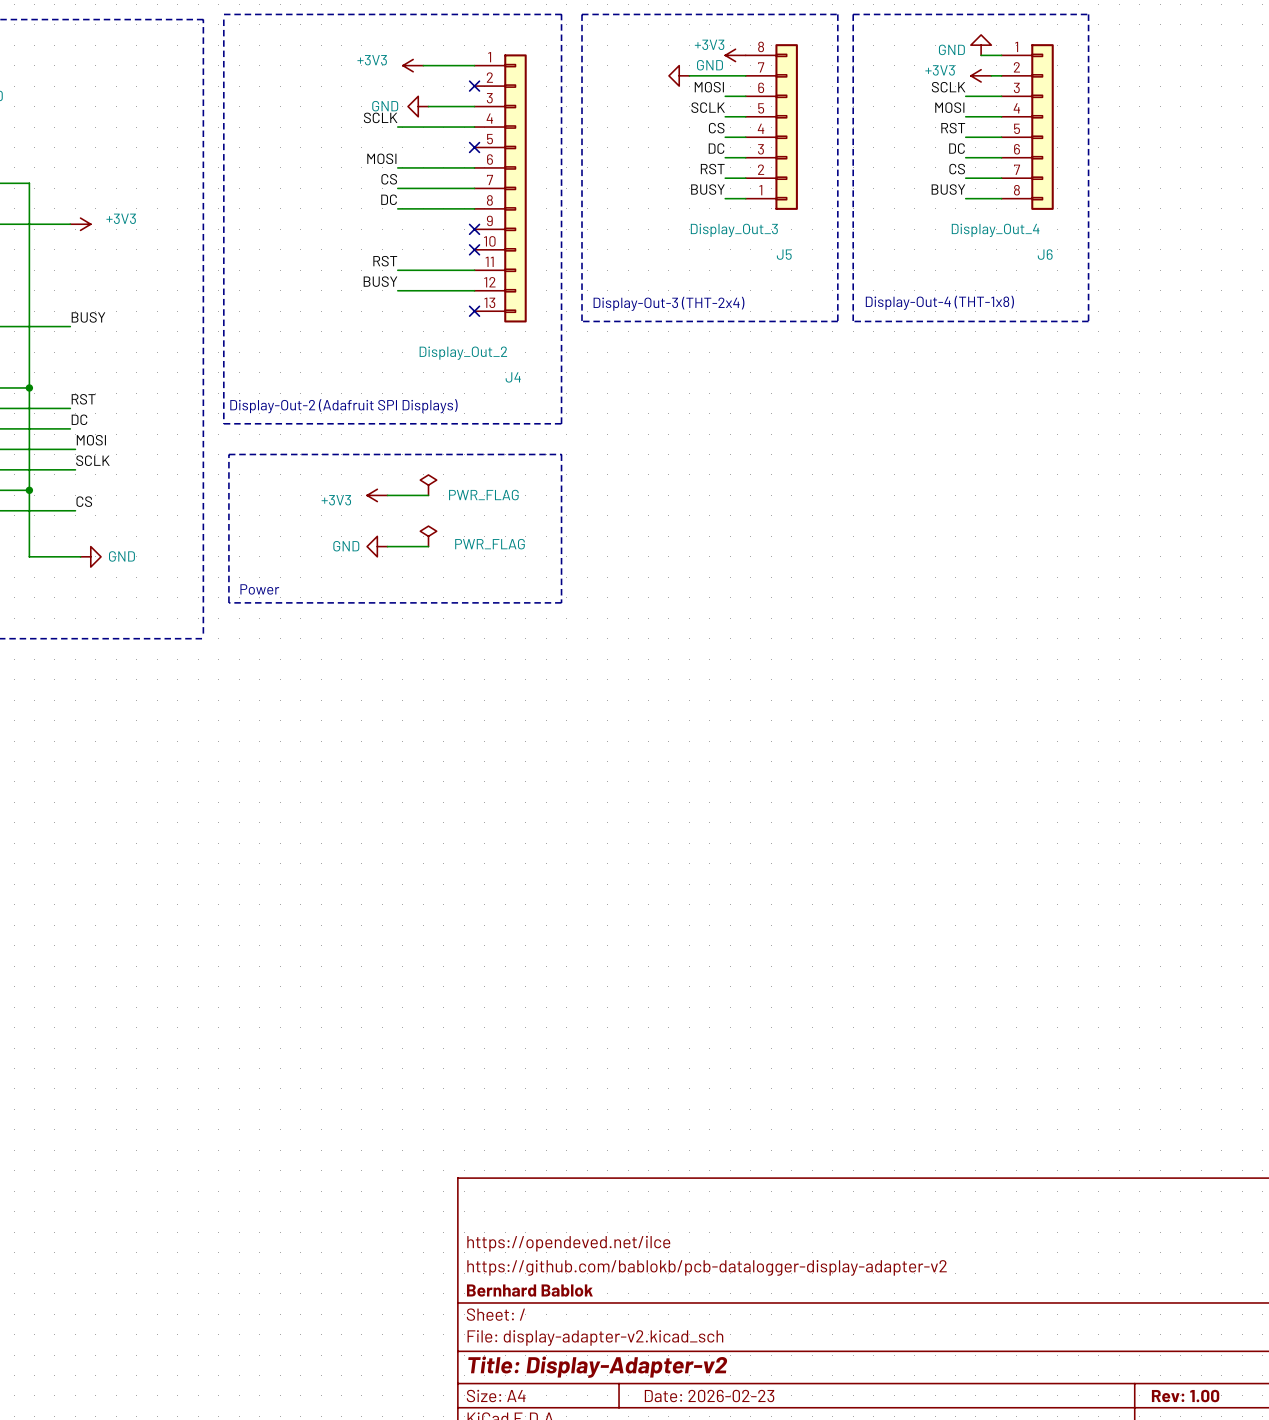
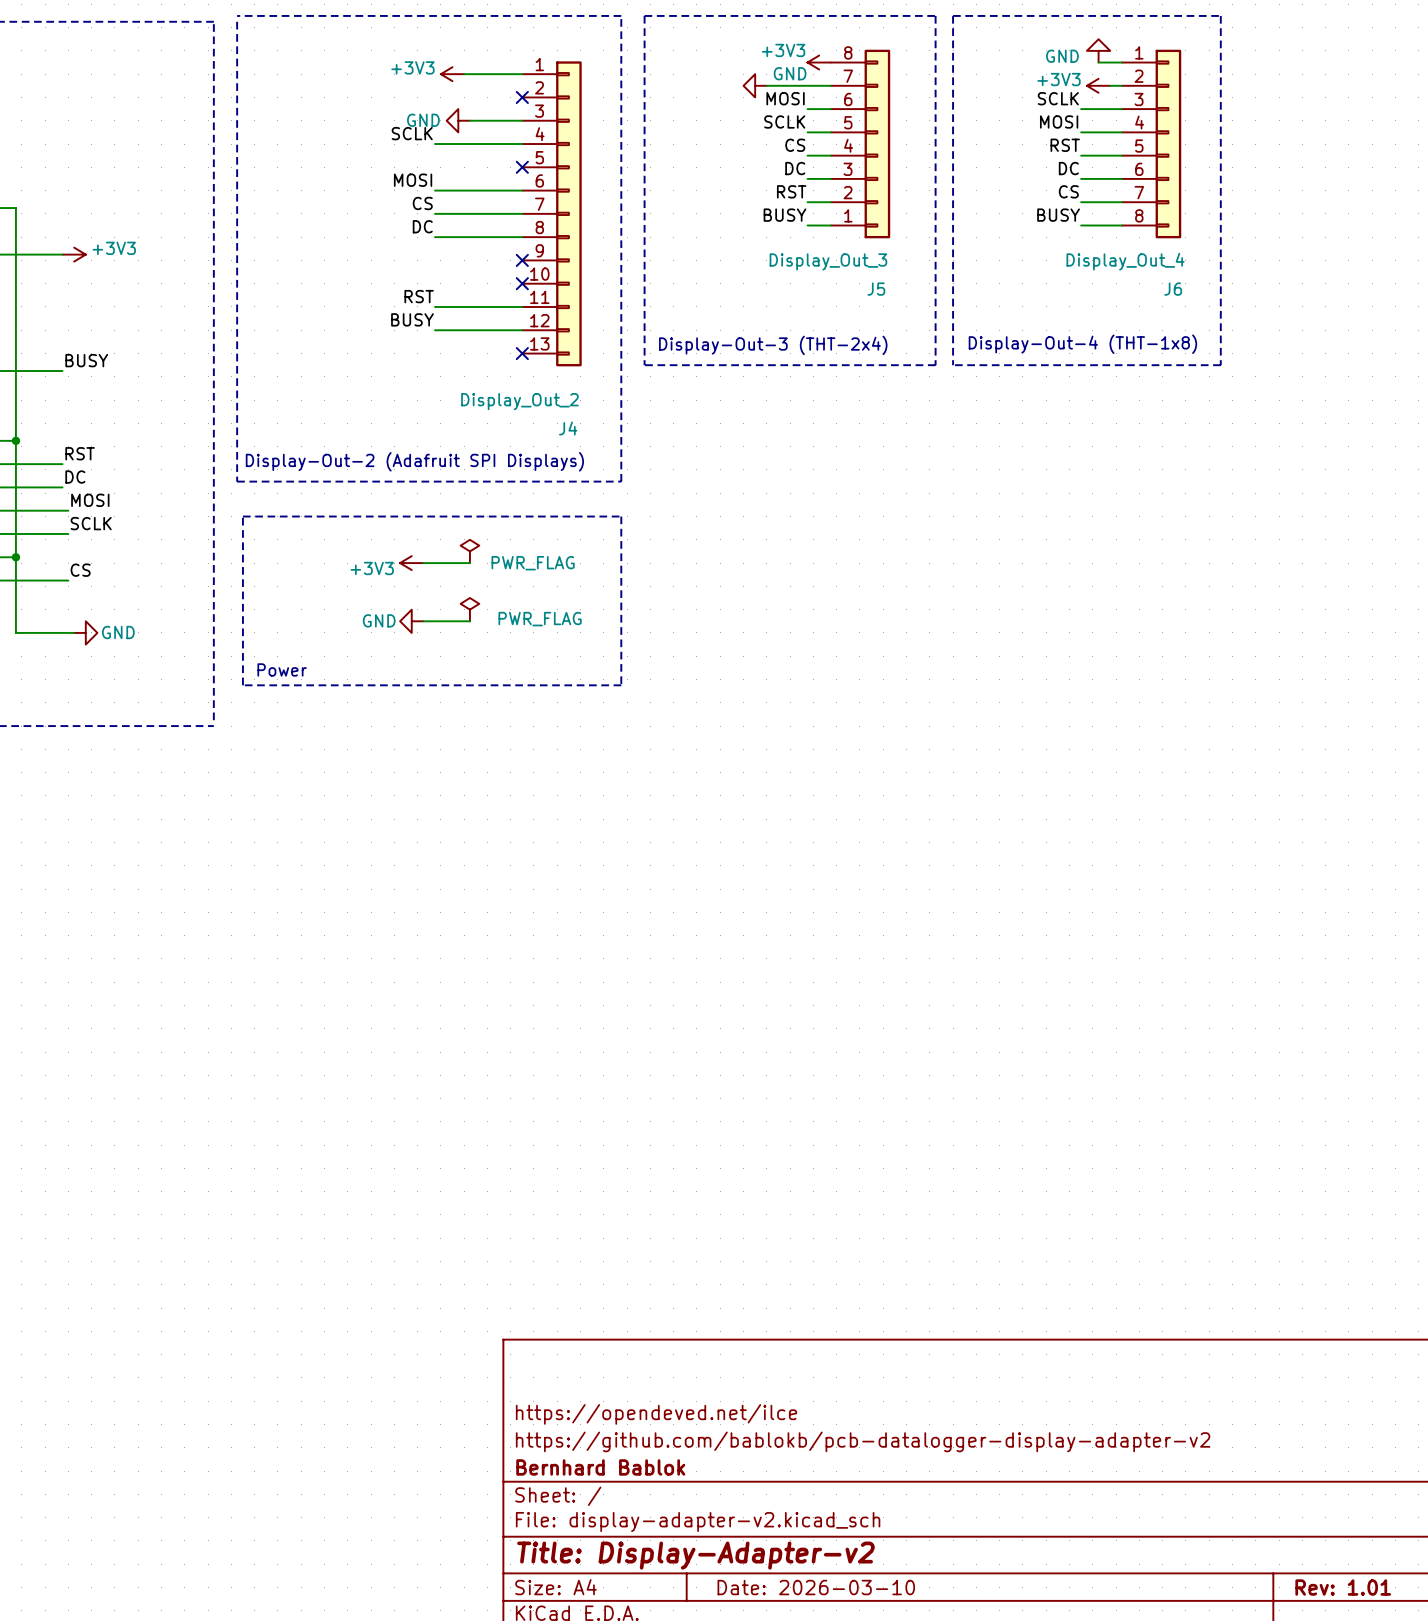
title block: Date: 2026-02-23 (709, 1396) -> Date: 2026-03-10 (816, 1587)
title block: Rev: 1.00 (1185, 1396) -> Rev: 1.01 (1343, 1587)

